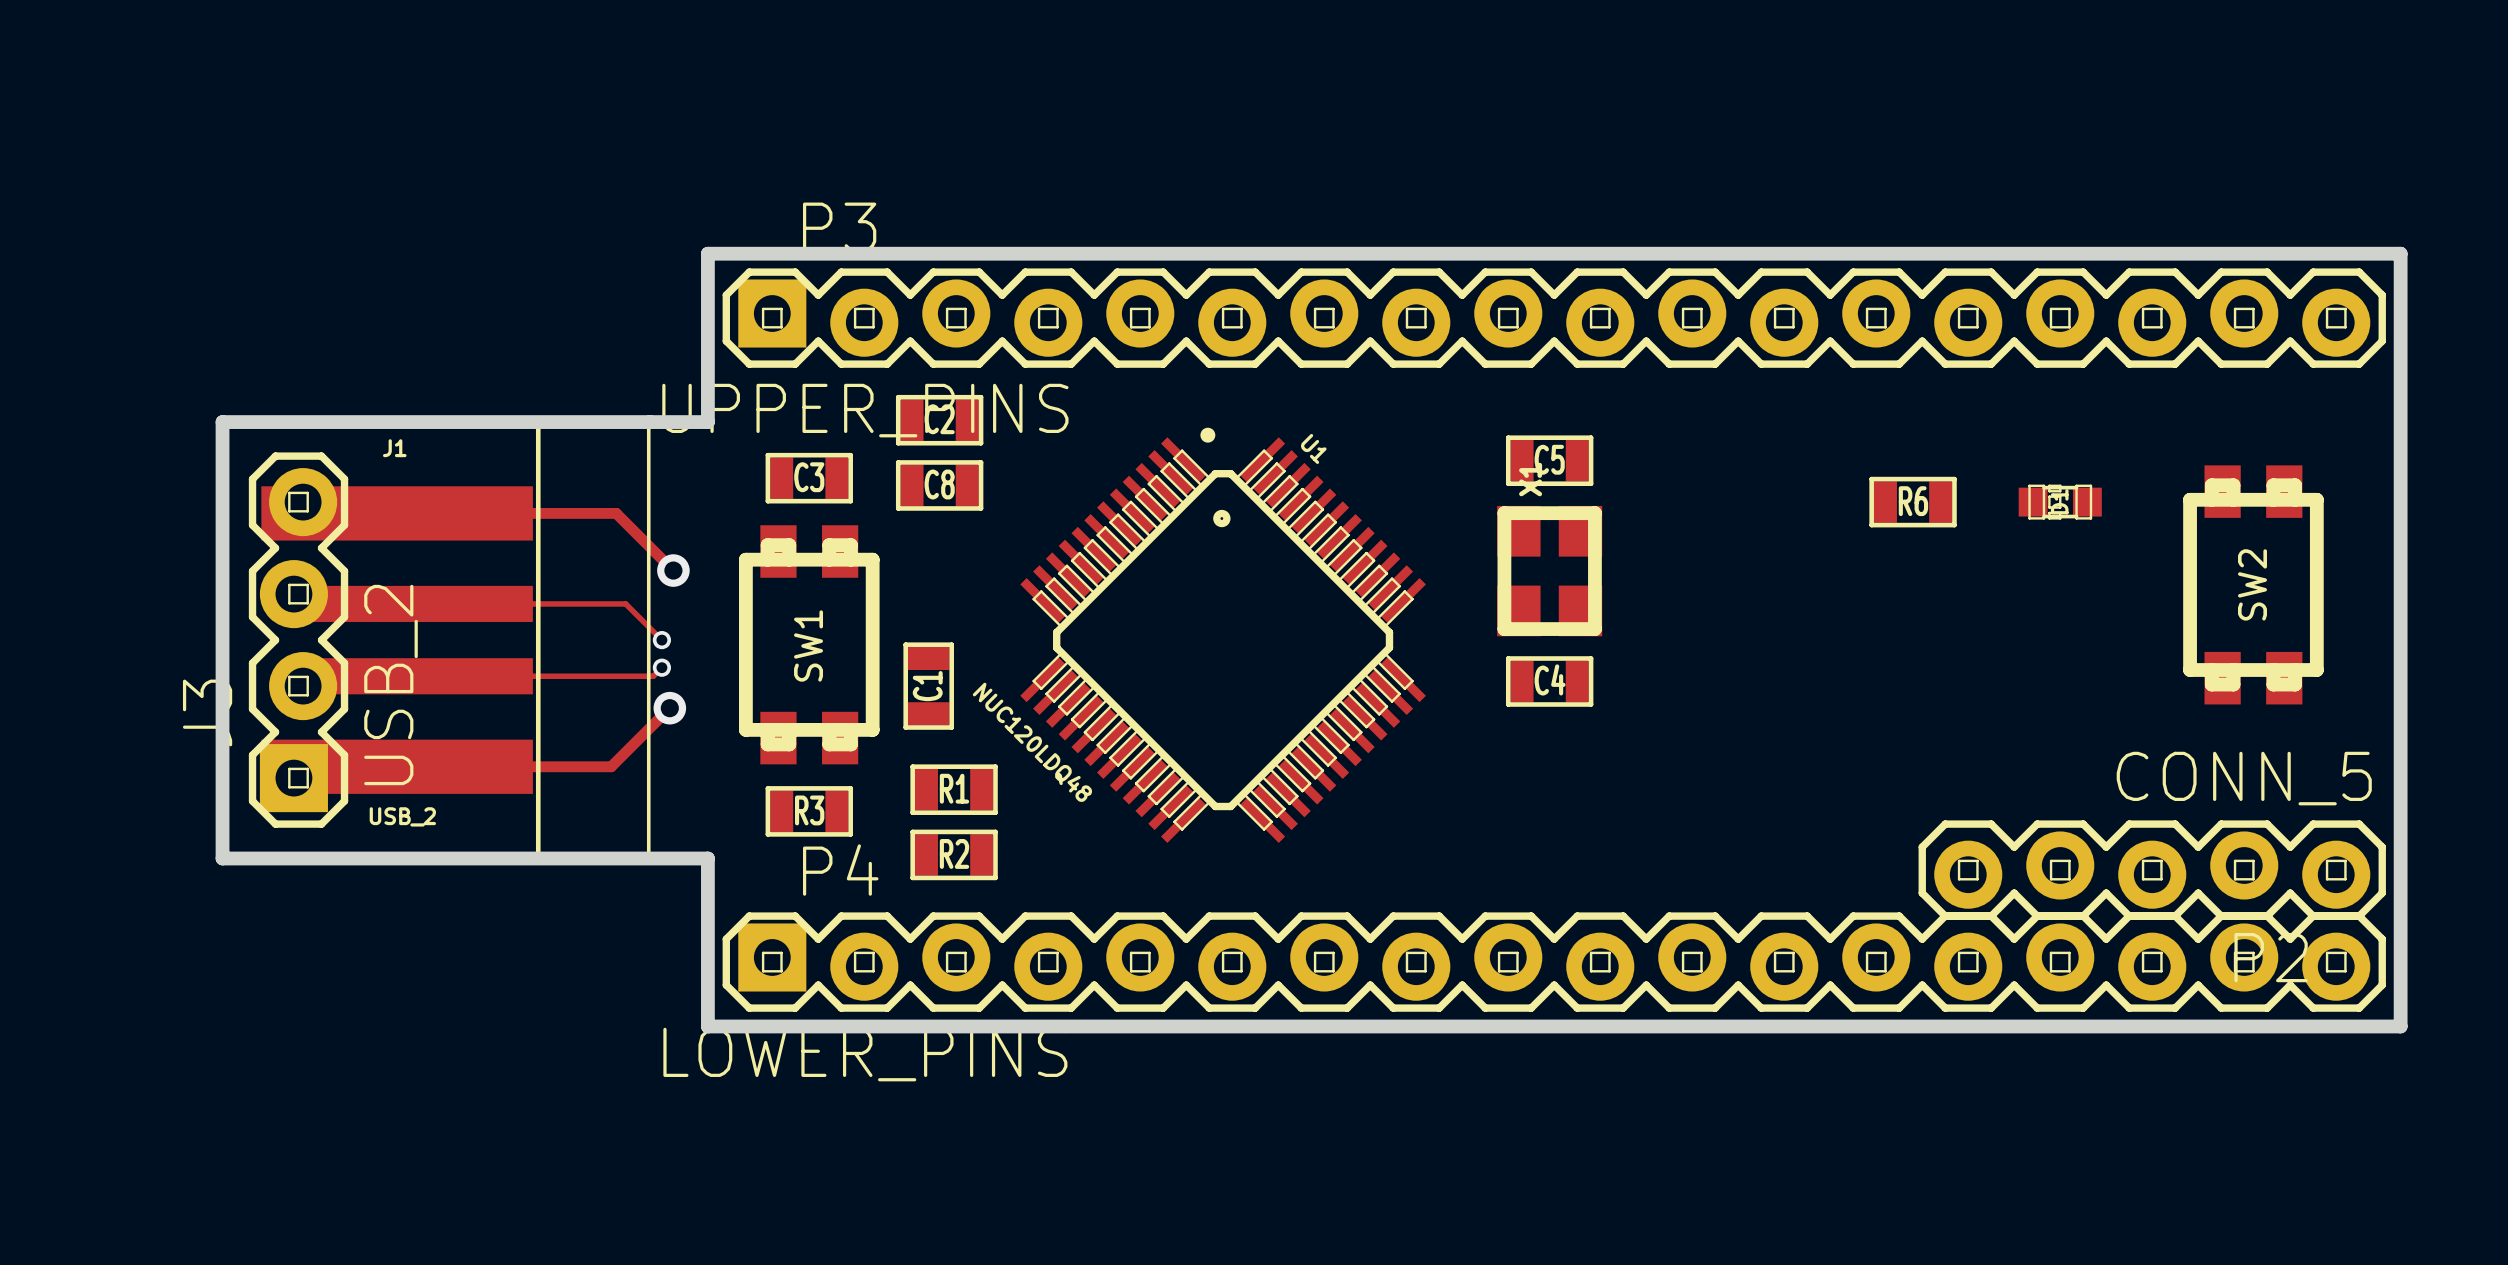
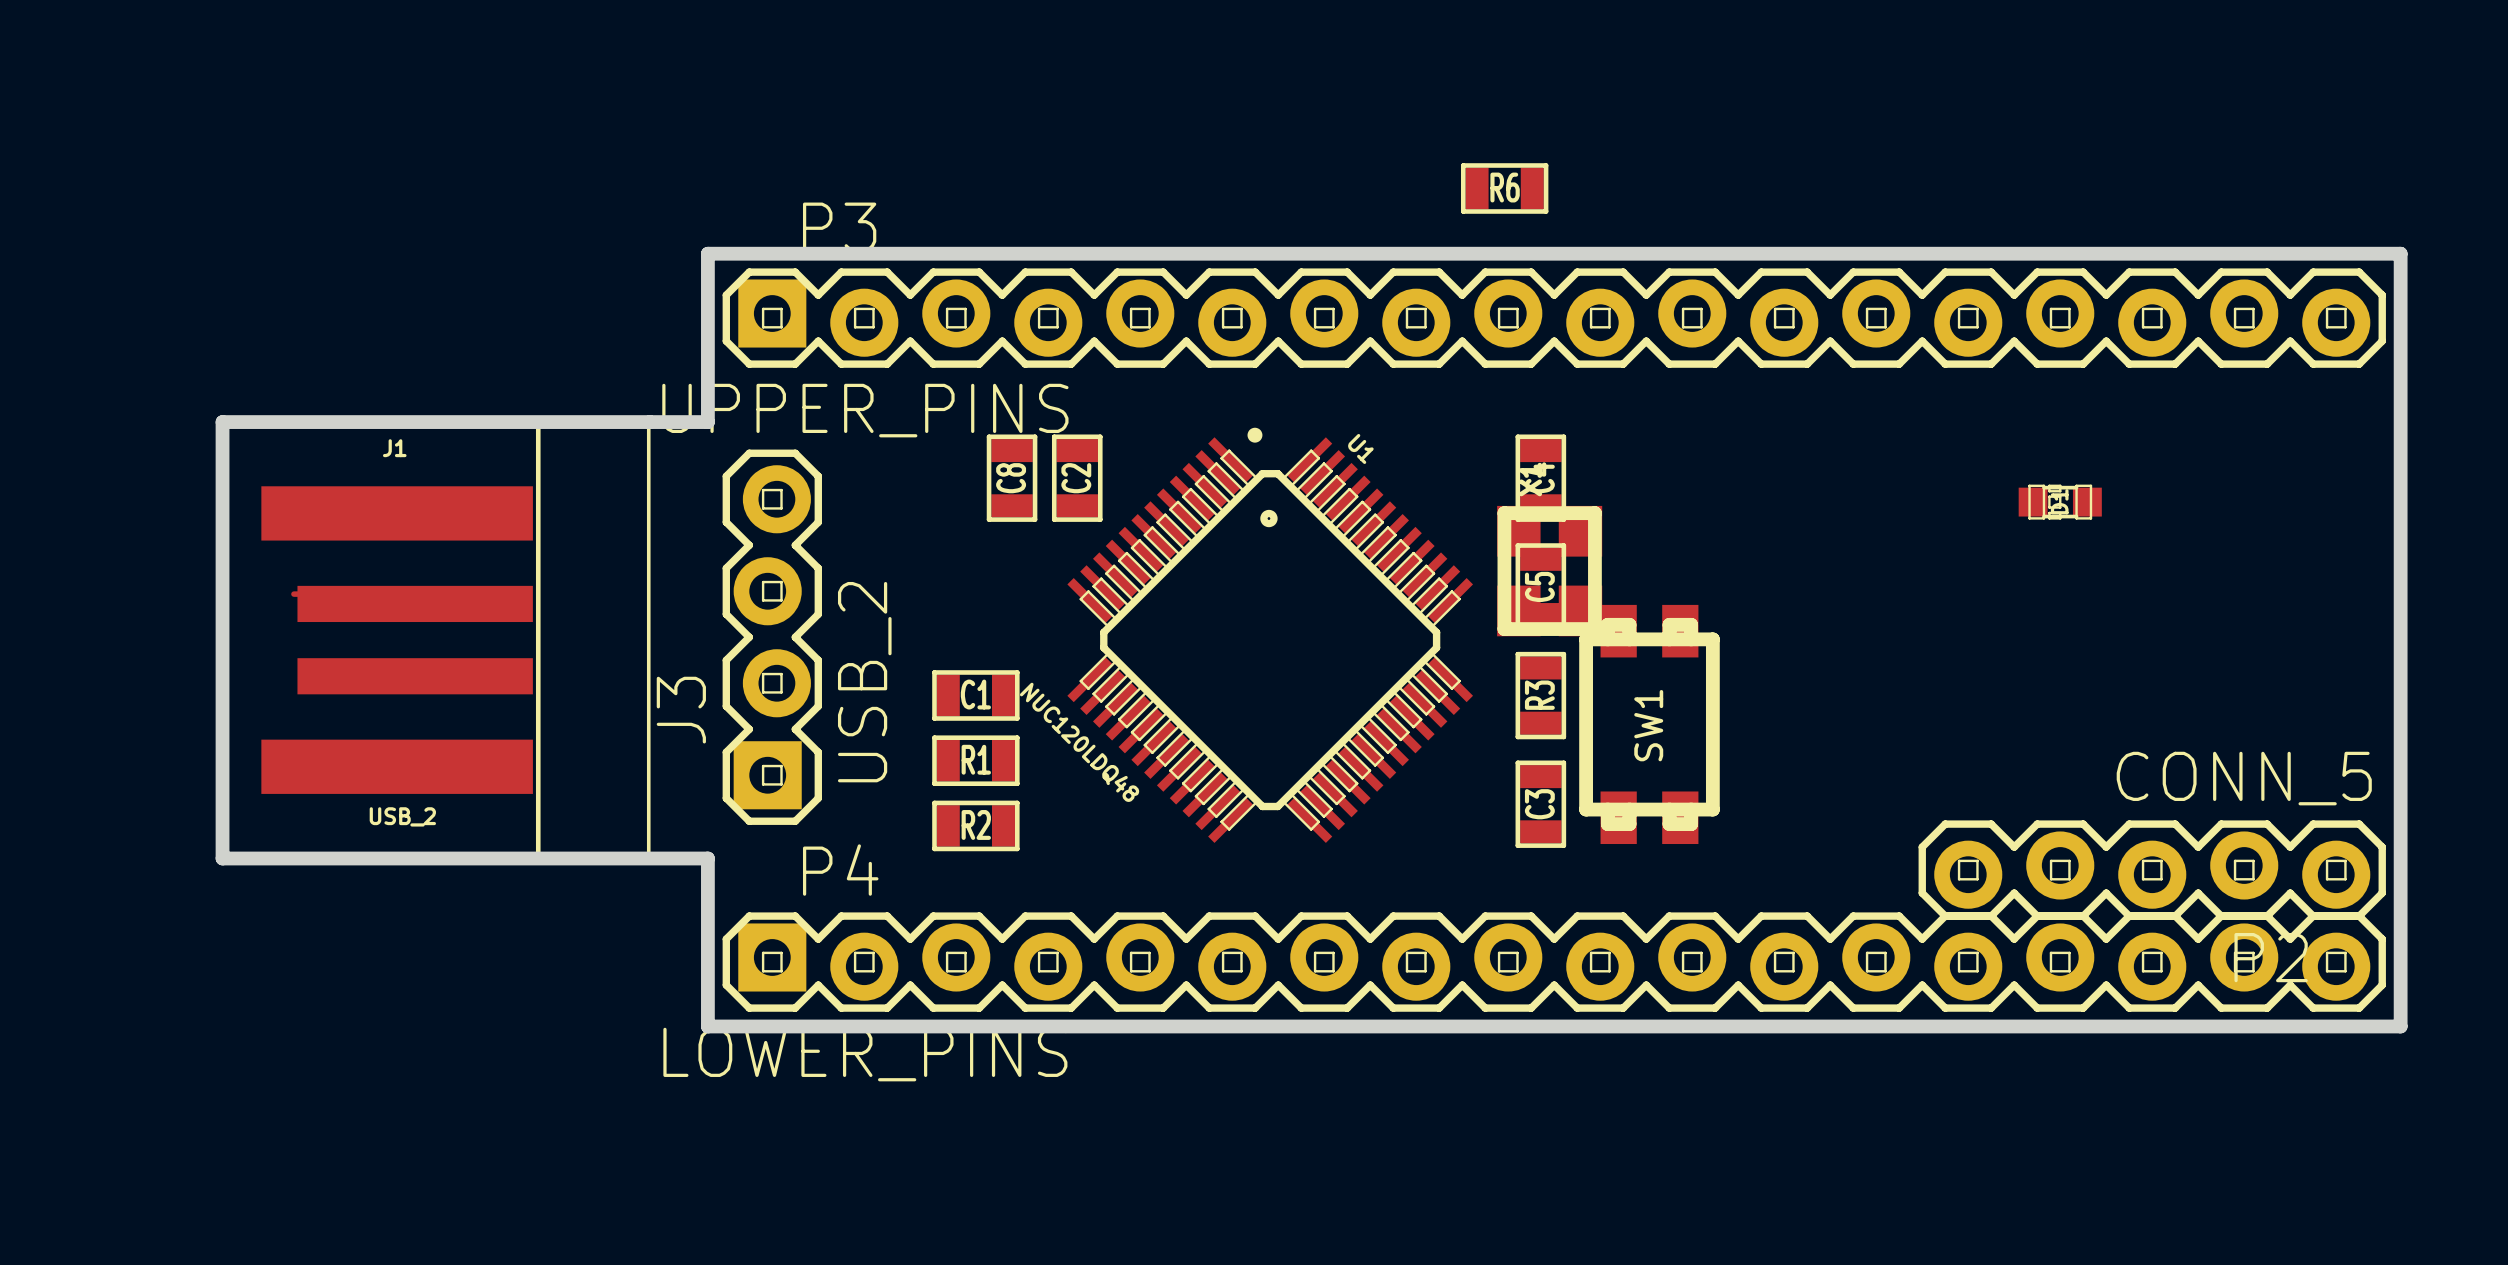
C2 rotation: 0° (939, 420) -> 90° clockwise (1077, 478)
C2 position: (939, 420) -> (1077, 478)
C5 rotation: 0° (1549, 460) -> 90° clockwise (1540, 586)
C5 position: (1549, 460) -> (1540, 586)
C3 rotation: 0° (809, 478) -> 90° clockwise (1540, 804)
C3 position: (809, 478) -> (1540, 804)
C8 rotation: 0° (939, 485) -> 90° clockwise (1012, 478)
C8 position: (939, 485) -> (1012, 478)
R6 position: (1913, 502) -> (1504, 188)
track: (397, 513) (616, 513) (673, 570) -> none
via: (673, 570) -> none
SW2: (2253, 584) -> none
track: (415, 603) (625, 603) (661, 640) -> none
U1 position: (1223, 635) -> (1270, 635)
J3 position: (298, 640) -> (772, 637)
via: (661, 640) -> none
SW1 position: (809, 644) -> (1649, 724)
track: (661, 667) (653, 676) (415, 676) -> none
via: (661, 667) -> none
C4 rotation: 0° (1549, 681) -> 90° clockwise (1540, 478)
C4 position: (1549, 681) -> (1540, 478)
C1 rotation: 0° (928, 686) -> 90° clockwise (975, 695)
track: (669, 708) (611, 766) (397, 766) -> none
via: (669, 708) -> none
R1 position: (954, 789) -> (975, 760)
R3 rotation: 0° (809, 811) -> 90° clockwise (1540, 695)
R3 position: (809, 811) -> (1540, 695)
R2 position: (954, 854) -> (975, 825)

